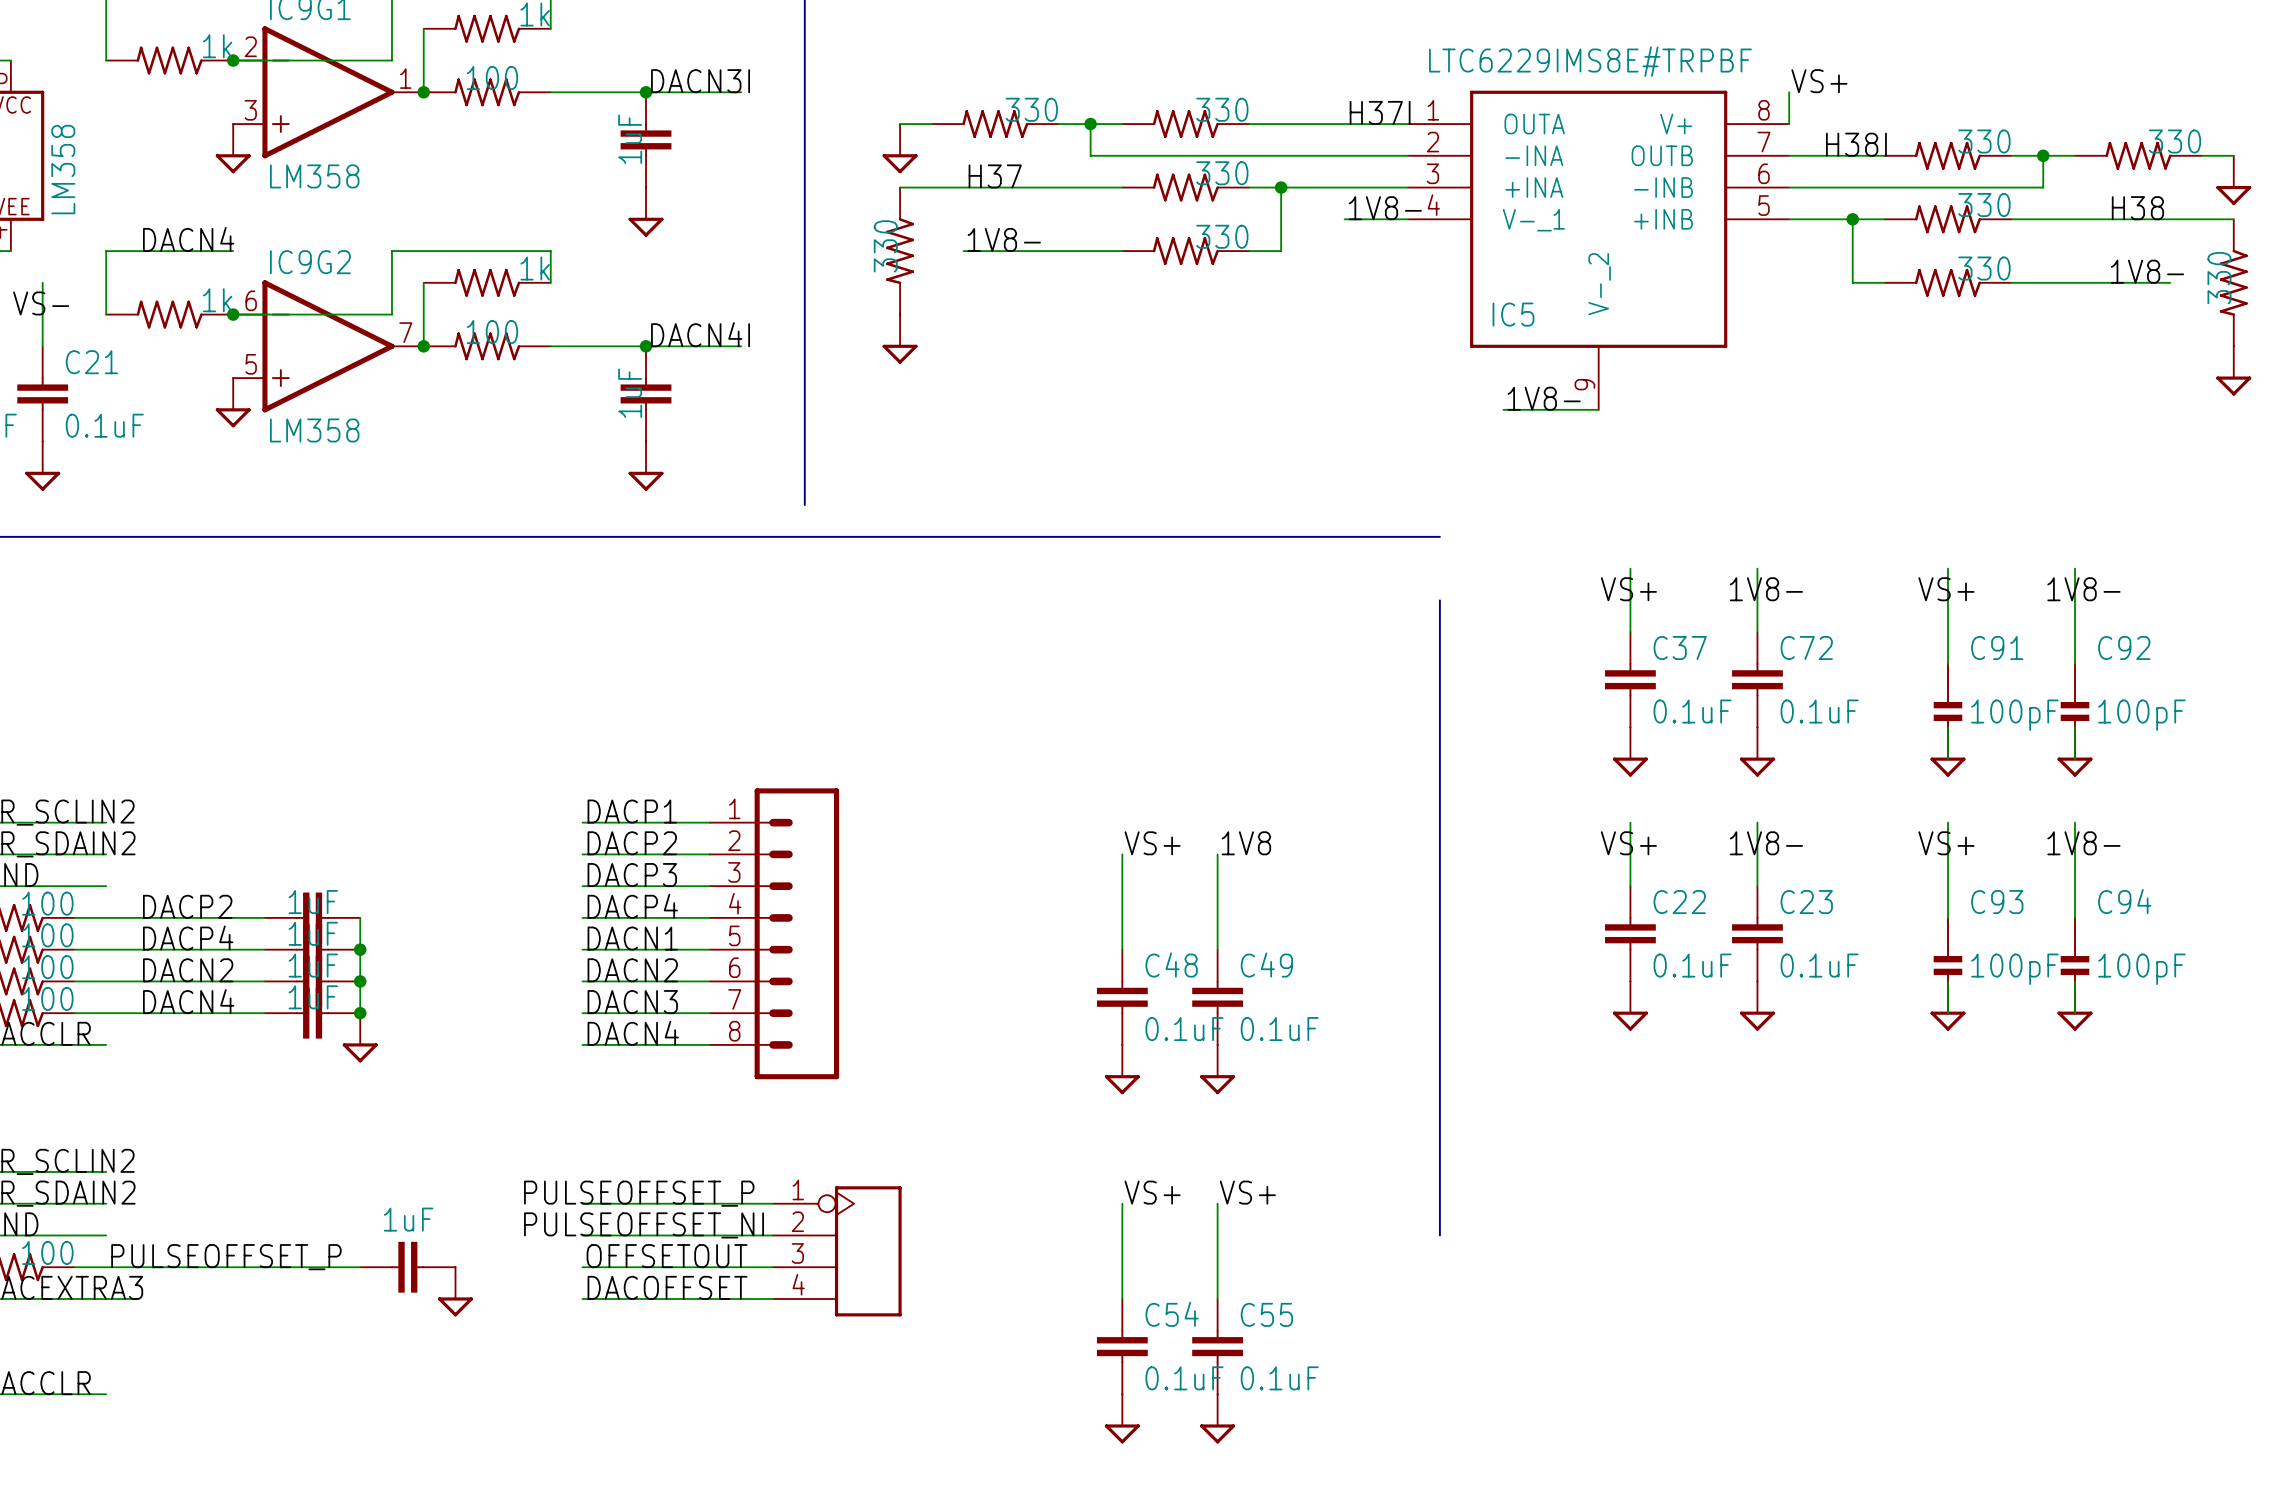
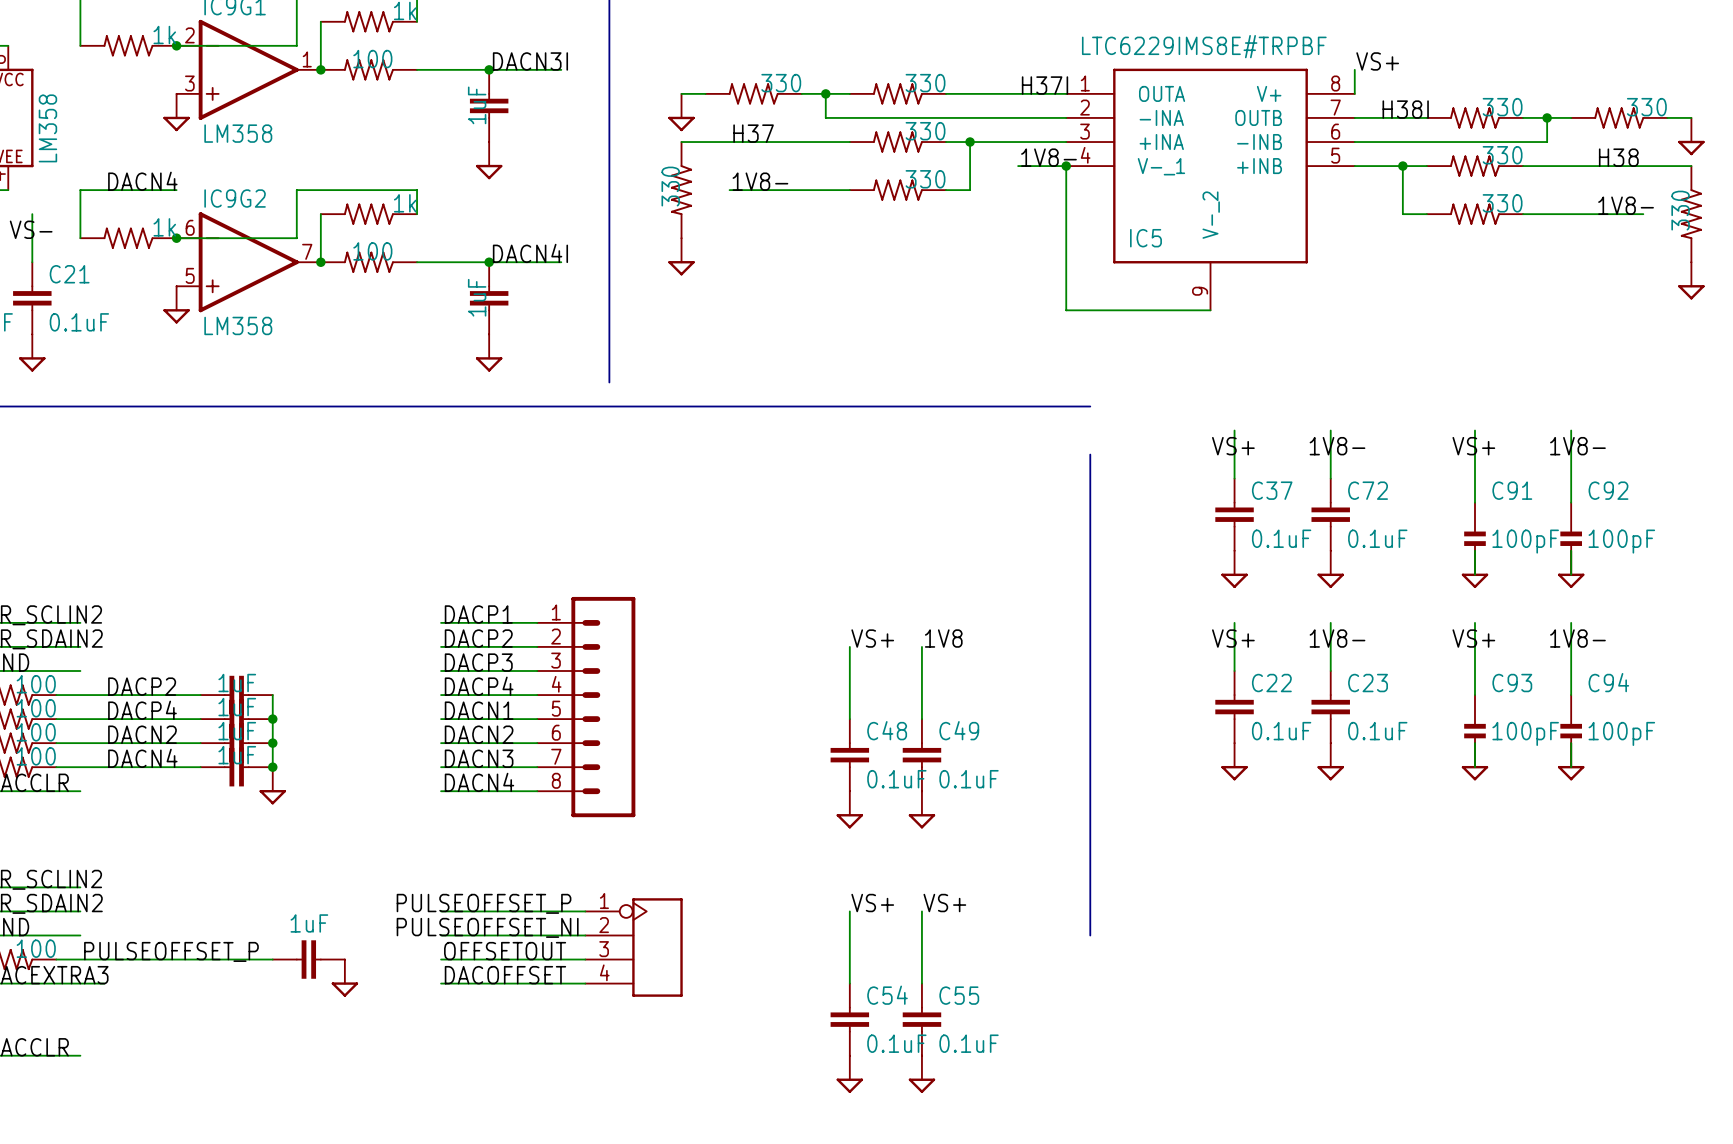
wire: none -> (1066, 166) (1066, 310) (1138, 310)
junction: none -> (1066, 166)
label: 1V8- (1544, 398) -> none

